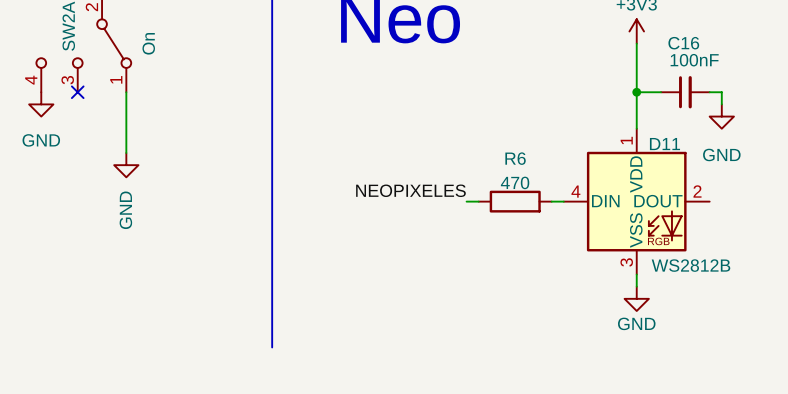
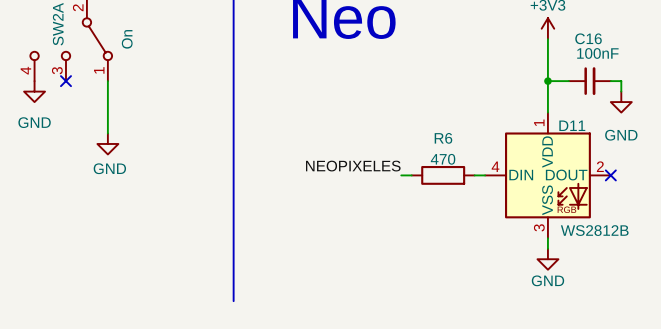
no-connect mark: none -> (610, 175)
power symbol text rotation: 0° (125, 210) -> 90° clockwise (109, 168)

